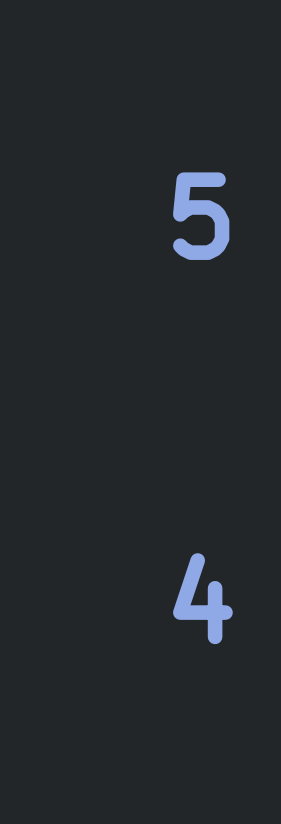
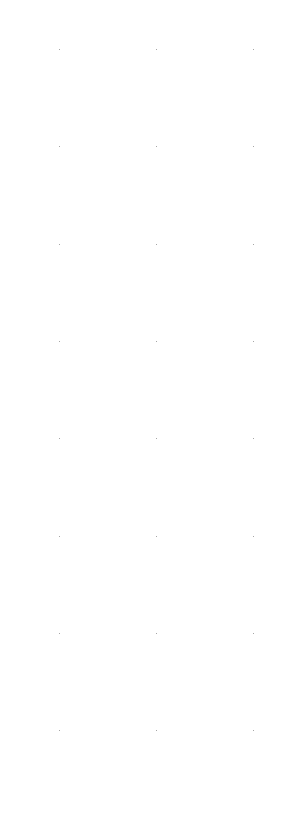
text: 5 (201, 216) -> none
text: 4 (202, 598) -> none

